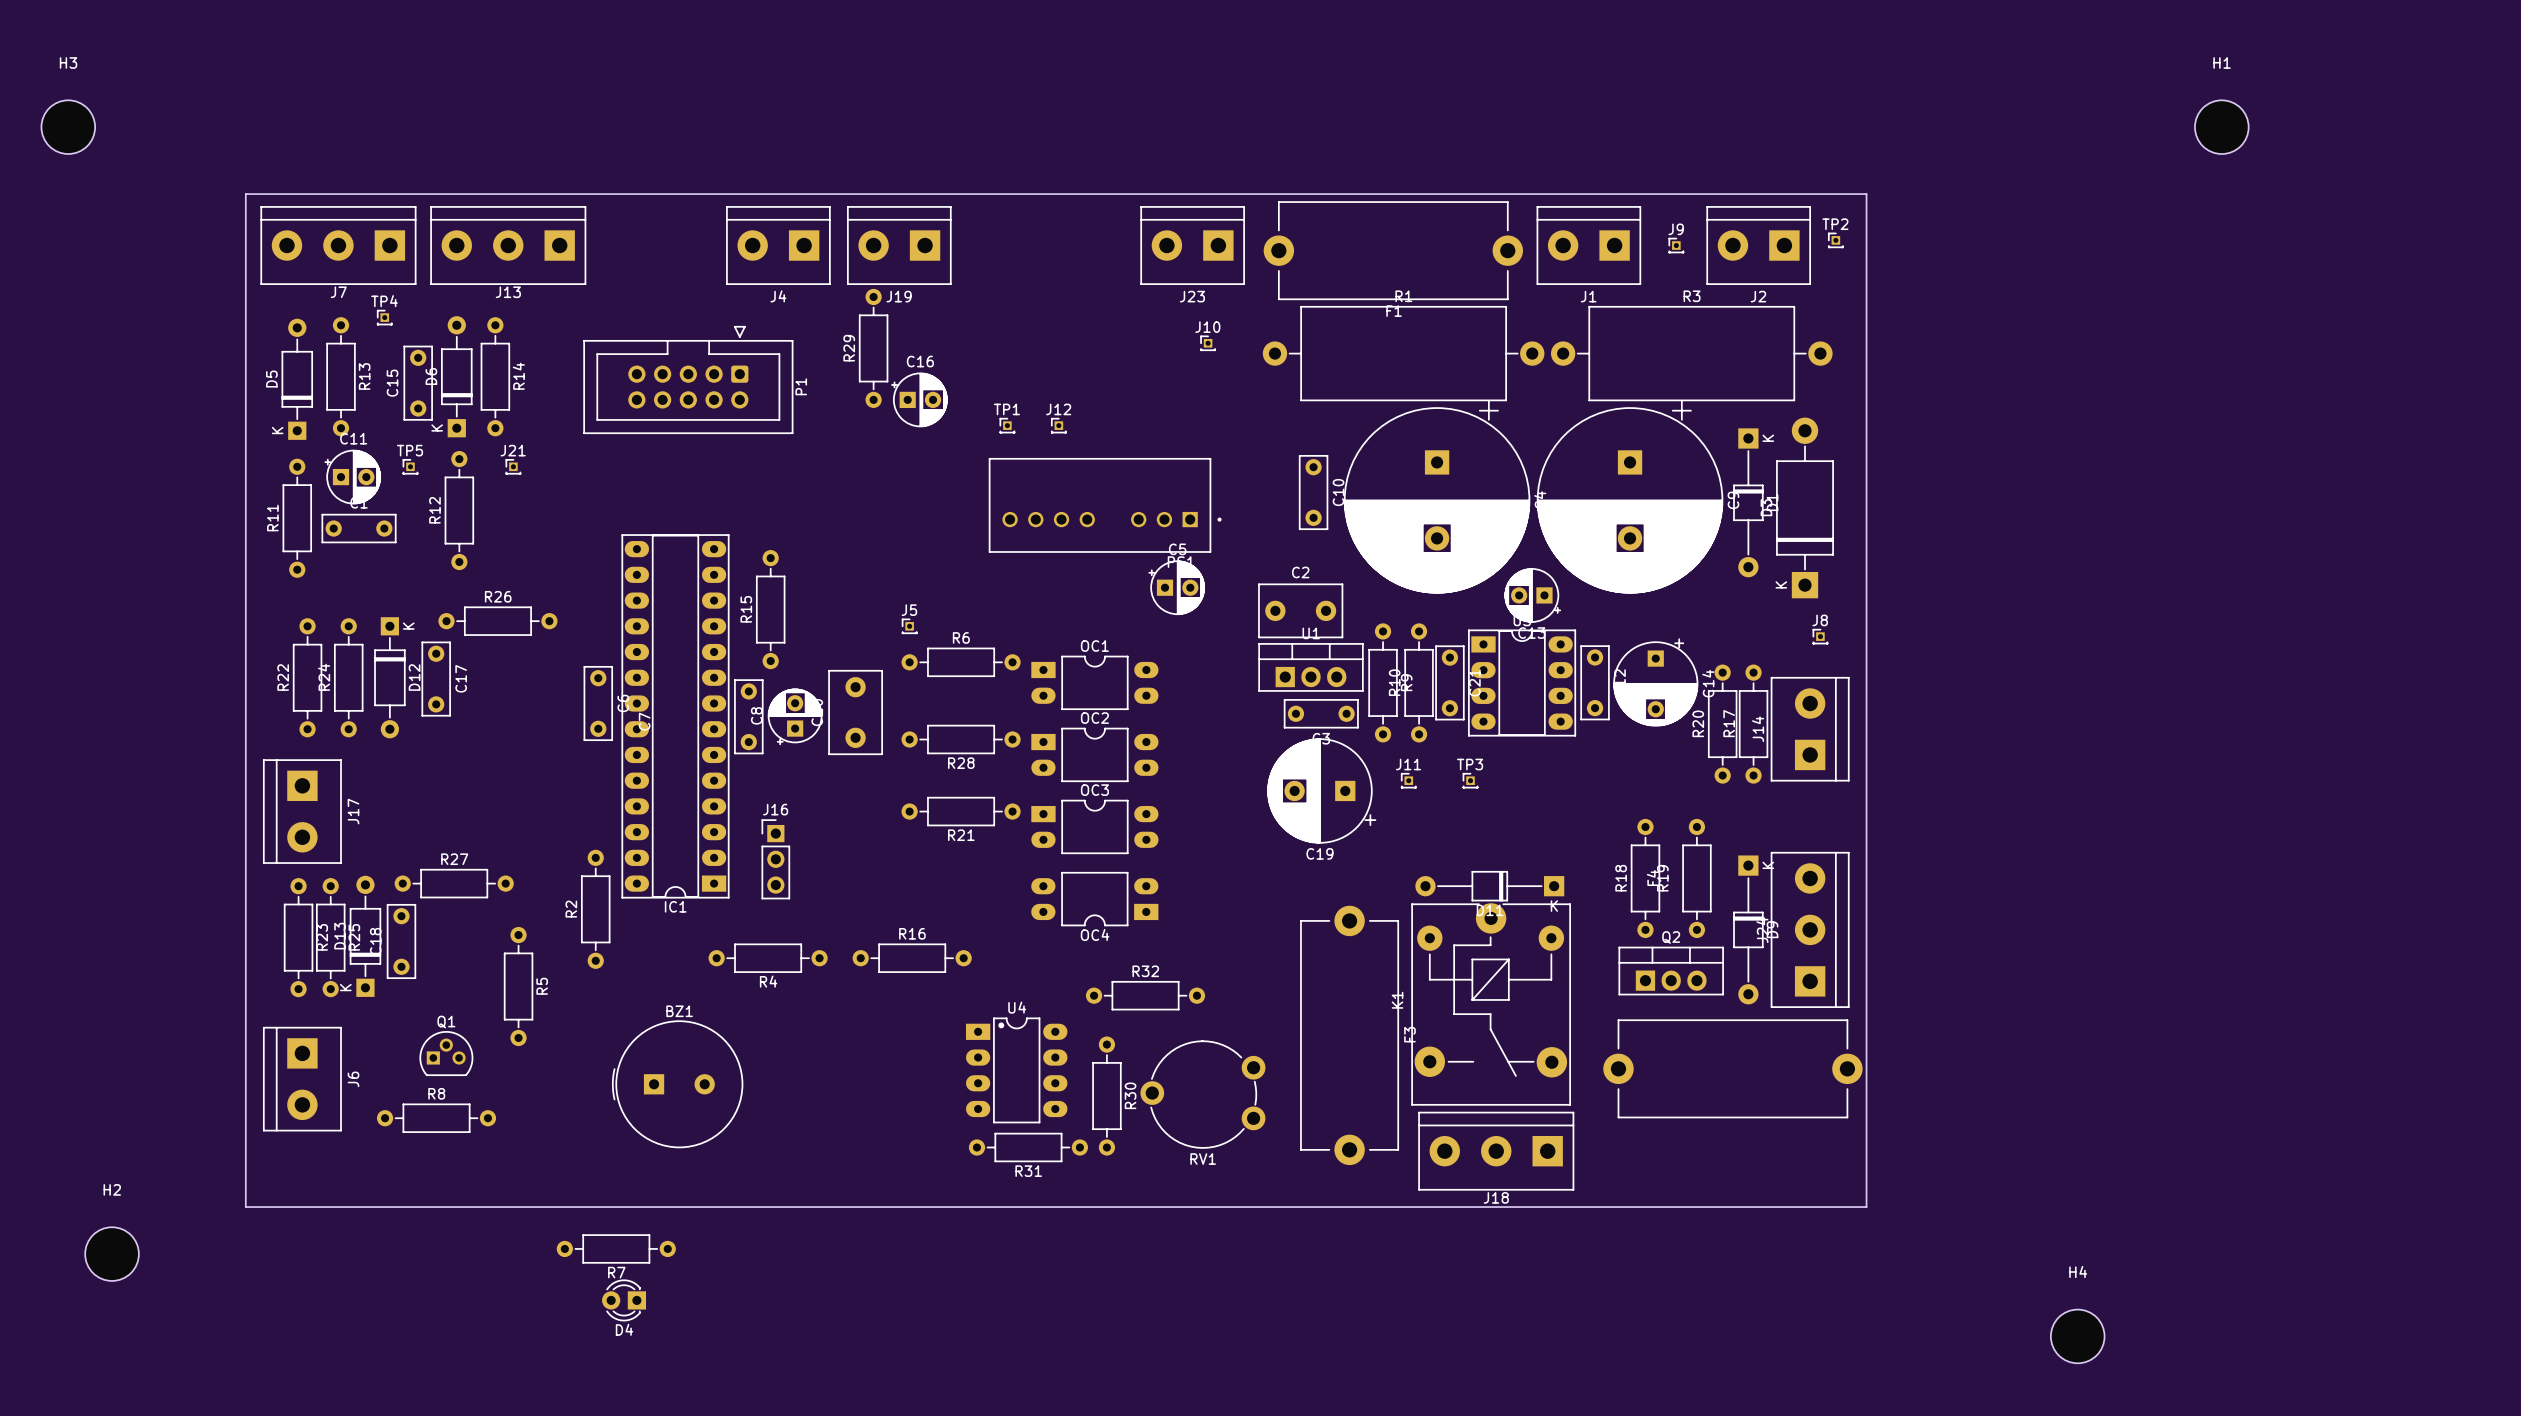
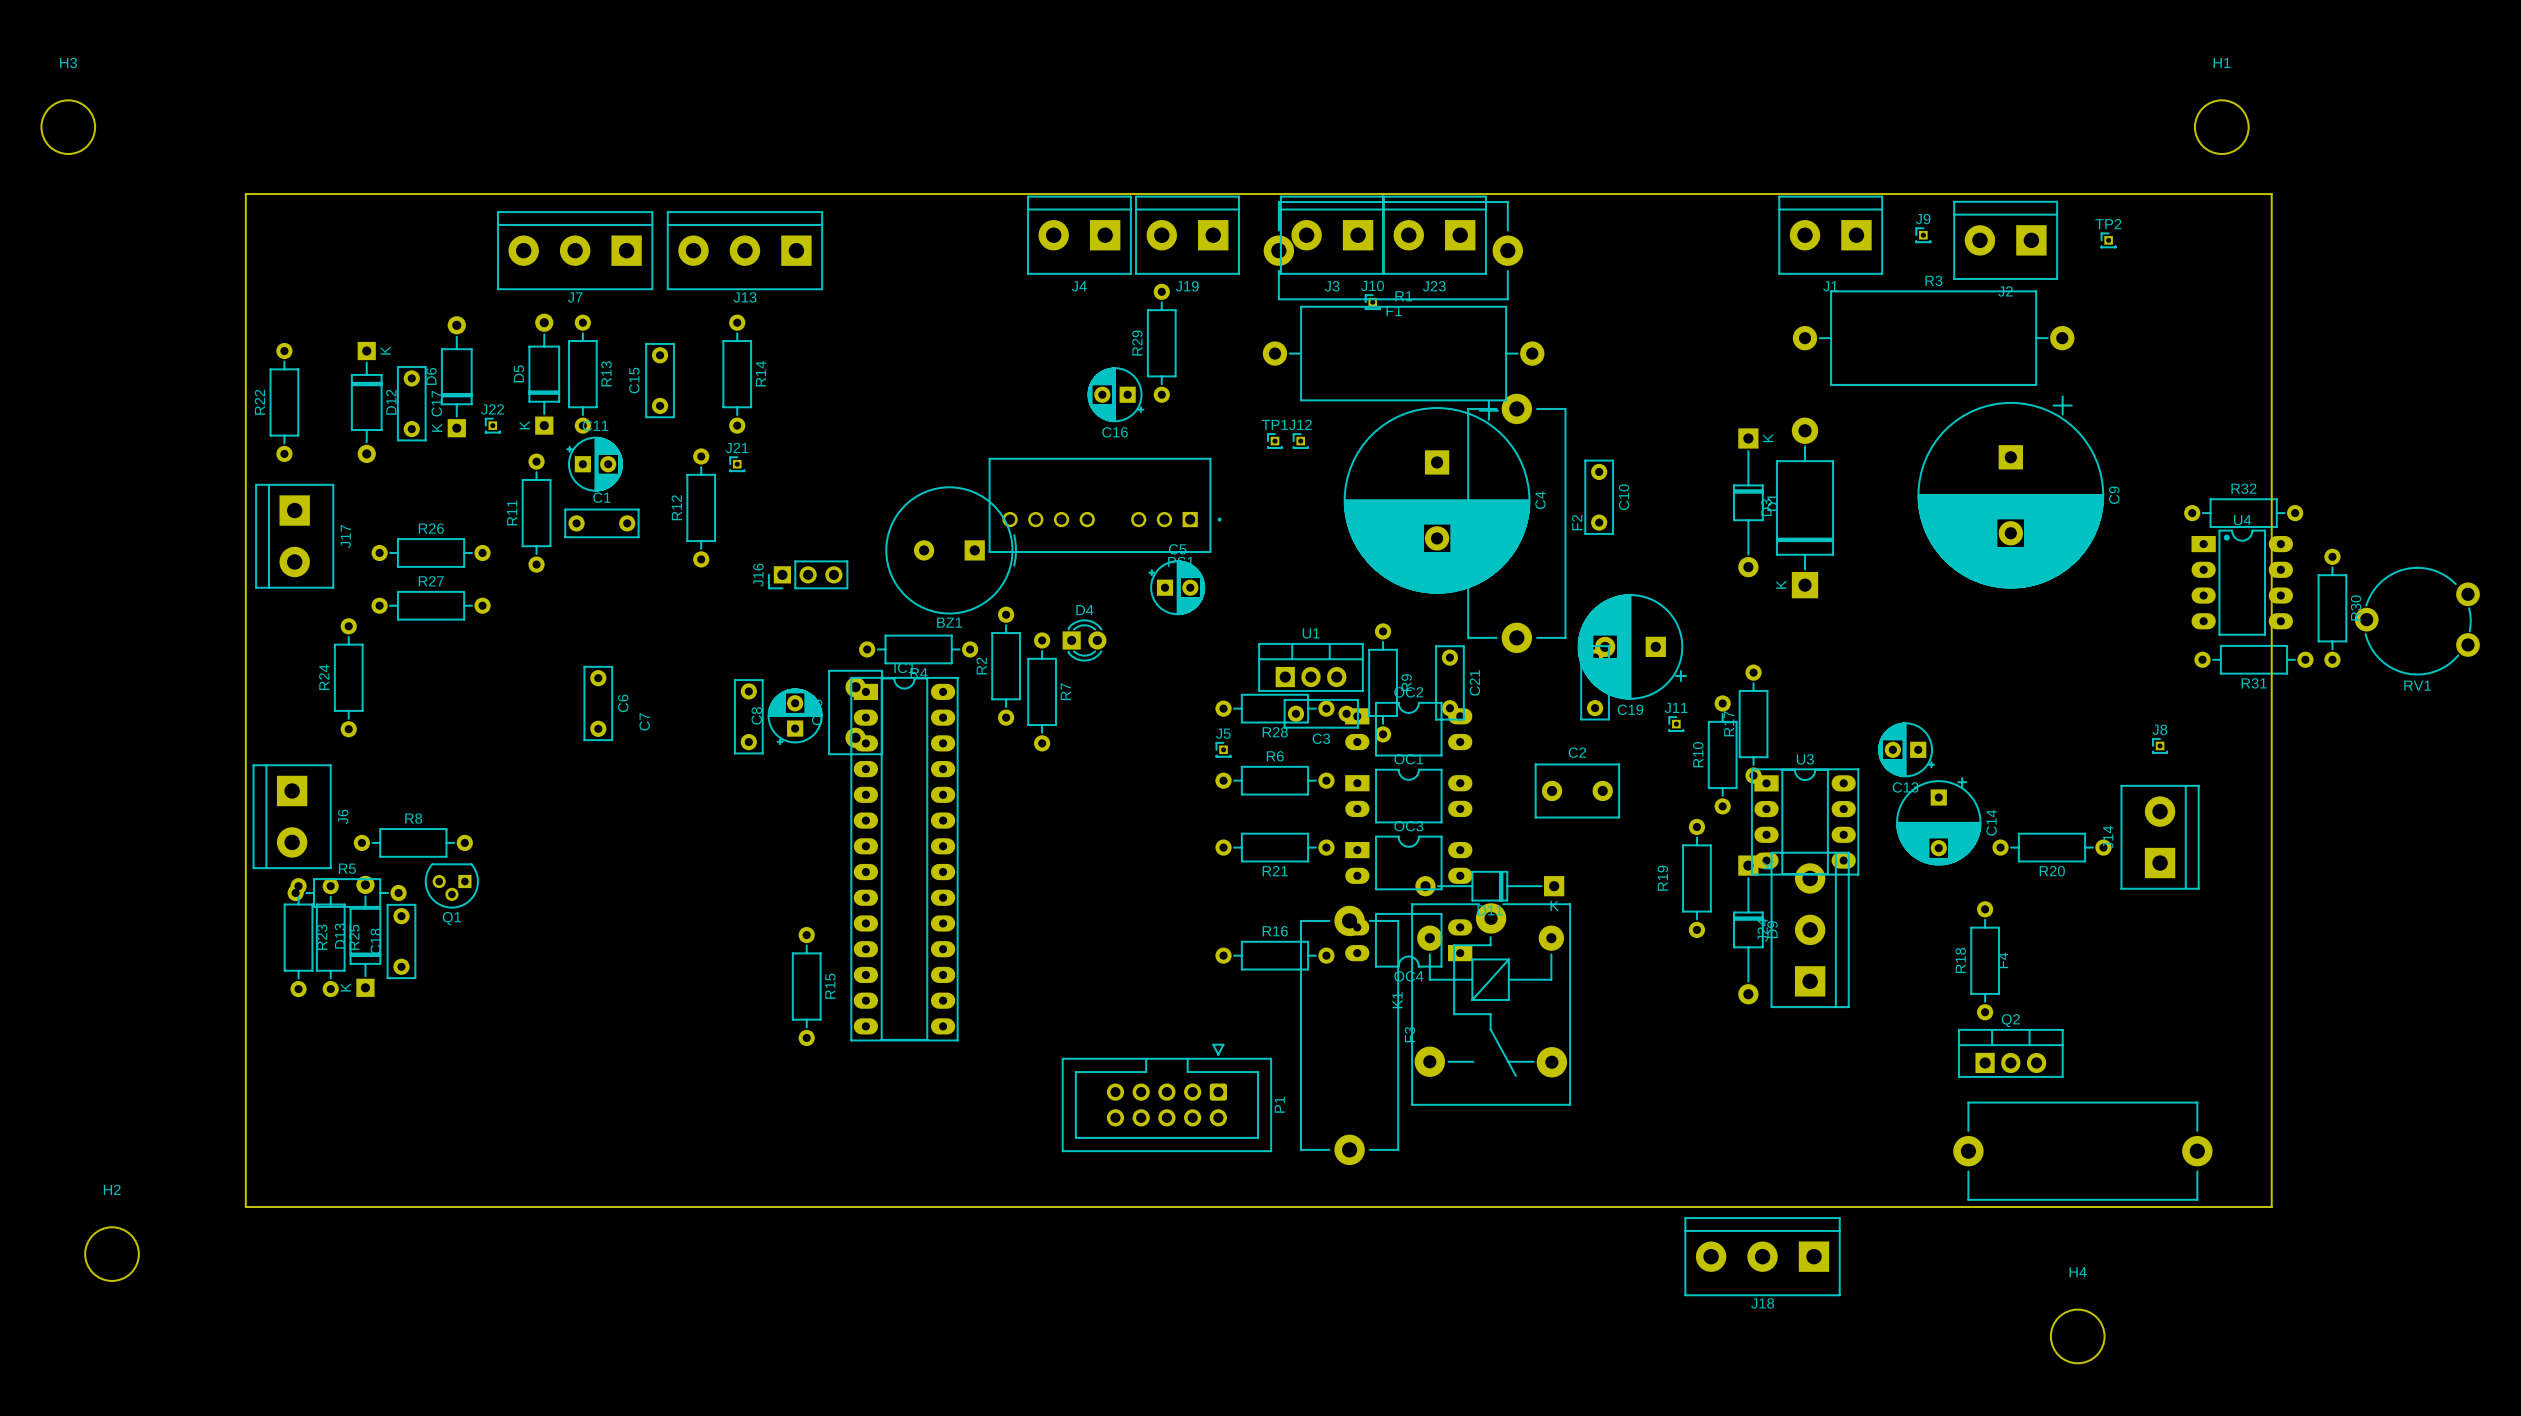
board edge: (1866, 194) (1866, 1207) -> (1866, 194) (2271, 194) (2271, 1207) (1866, 1207)
J3: none -> (1332, 235)
TP2 position: (1835, 240) -> (2108, 240)
J7 position: (338, 245) -> (575, 250)
J13 position: (508, 245) -> (744, 250)
J4 position: (778, 245) -> (1079, 235)
J19 position: (899, 245) -> (1187, 235)
J23 position: (1192, 245) -> (1434, 235)
J1 position: (1588, 245) -> (1830, 235)
J9 position: (1676, 245) -> (1923, 235)
J2 position: (1758, 245) -> (2005, 240)
TP4: (384, 317) -> none
J10 position: (1208, 343) -> (1372, 302)
R29 position: (873, 348) -> (1161, 343)
R3 position: (1691, 353) -> (1933, 338)
R13 position: (341, 376) -> (582, 374)
R14 position: (495, 376) -> (737, 374)
D5 position: (297, 379) -> (544, 374)
P1 position: (688, 379) -> (1166, 1097)
C15 position: (418, 383) -> (660, 380)
C16 rotation: 0° (919, 399) -> 180° (1115, 394)
C16 position: (919, 399) -> (1115, 394)
J22: none -> (492, 425)
TP1 position: (1007, 425) -> (1274, 441)
J12 position: (1058, 425) -> (1300, 441)
TP5: (410, 466) -> none
J21 position: (513, 466) -> (737, 464)
C11 position: (352, 477) -> (594, 464)
C10 position: (1313, 492) -> (1599, 497)
C9 position: (1630, 497) -> (2010, 492)
R12 position: (459, 510) -> (701, 507)
R11 position: (297, 518) -> (536, 513)
F2: none -> (1516, 523)
C1 position: (359, 528) -> (601, 523)
C13 position: (1532, 595) -> (1906, 749)
R15 name position: R15 (746, 609) -> R15 (830, 986)
R15 position: (770, 609) -> (806, 986)
C2 position: (1300, 610) -> (1577, 790)
R26 position: (497, 621) -> (431, 552)
J5 position: (909, 626) -> (1223, 749)
J8 position: (1820, 636) -> (2160, 745)
R6 position: (961, 662) -> (1274, 780)
R22 position: (307, 677) -> (284, 402)
D12 position: (389, 677) -> (366, 402)
C17 position: (436, 679) -> (411, 403)
OC1 position: (1094, 682) -> (1408, 796)
R10 position: (1419, 682) -> (1722, 754)
C14 position: (1655, 682) -> (1938, 821)
U3 position: (1522, 683) -> (1805, 821)
IC1 rotation: 0° (675, 716) -> 180° (904, 859)
IC1 position: (675, 716) -> (904, 859)
R20 name position: R20 (1698, 723) -> R20 (2052, 871)
R20 rotation: 0° (1722, 724) -> 90° clockwise (2051, 847)
R20 position: (1722, 724) -> (2051, 847)
J14 position: (1810, 729) -> (2160, 837)
R28 position: (961, 739) -> (1274, 708)
OC2 position: (1094, 754) -> (1408, 729)
J11 position: (1408, 780) -> (1676, 724)
TP3: (1470, 780) -> none
C19 position: (1321, 790) -> (1632, 646)
J17 position: (302, 811) -> (294, 536)
R21 position: (961, 811) -> (1274, 847)
OC3 position: (1094, 826) -> (1408, 862)
J16 rotation: 0° (775, 859) -> 90° counterclockwise (808, 574)
J16 position: (775, 859) -> (808, 574)
R18 position: (1645, 878) -> (1985, 960)
R27 position: (454, 883) -> (431, 605)
OC4 position: (1094, 899) -> (1408, 940)
R2 position: (595, 909) -> (1006, 666)
R4 position: (768, 958) -> (918, 649)
R16 position: (912, 958) -> (1274, 955)
Q2 position: (1671, 971) -> (2010, 1053)
R5 rotation: 0° (518, 986) -> 90° clockwise (347, 893)
R5 position: (518, 986) -> (347, 893)
R5 name position: R5 (542, 986) -> R5 (347, 868)
R32 position: (1145, 995) -> (2243, 513)
Q1 rotation: 0° (446, 1053) -> 180° (451, 885)
Q1 position: (446, 1053) -> (451, 885)
F4 position: (1732, 1068) -> (2082, 1151)
U4 position: (1016, 1070) -> (2242, 582)
J6 position: (302, 1079) -> (292, 816)
BZ1 rotation: 0° (677, 1084) -> 180° (951, 550)
BZ1 position: (677, 1084) -> (951, 550)
RV1 position: (1202, 1094) -> (2417, 621)
R30 position: (1106, 1096) -> (2332, 608)
R8 position: (436, 1118) -> (413, 842)
R31 position: (1028, 1147) -> (2253, 659)
J18 position: (1496, 1151) -> (1762, 1256)
R7 rotation: 0° (616, 1248) -> 90° clockwise (1042, 691)
R7 position: (616, 1248) -> (1042, 691)
R7 name position: R7 (616, 1272) -> R7 (1065, 691)
D4 footprint: [602, 1279, 647, 1322] -> [1062, 619, 1107, 662]
D4 name position: D4 (624, 1329) -> D4 (1084, 610)

